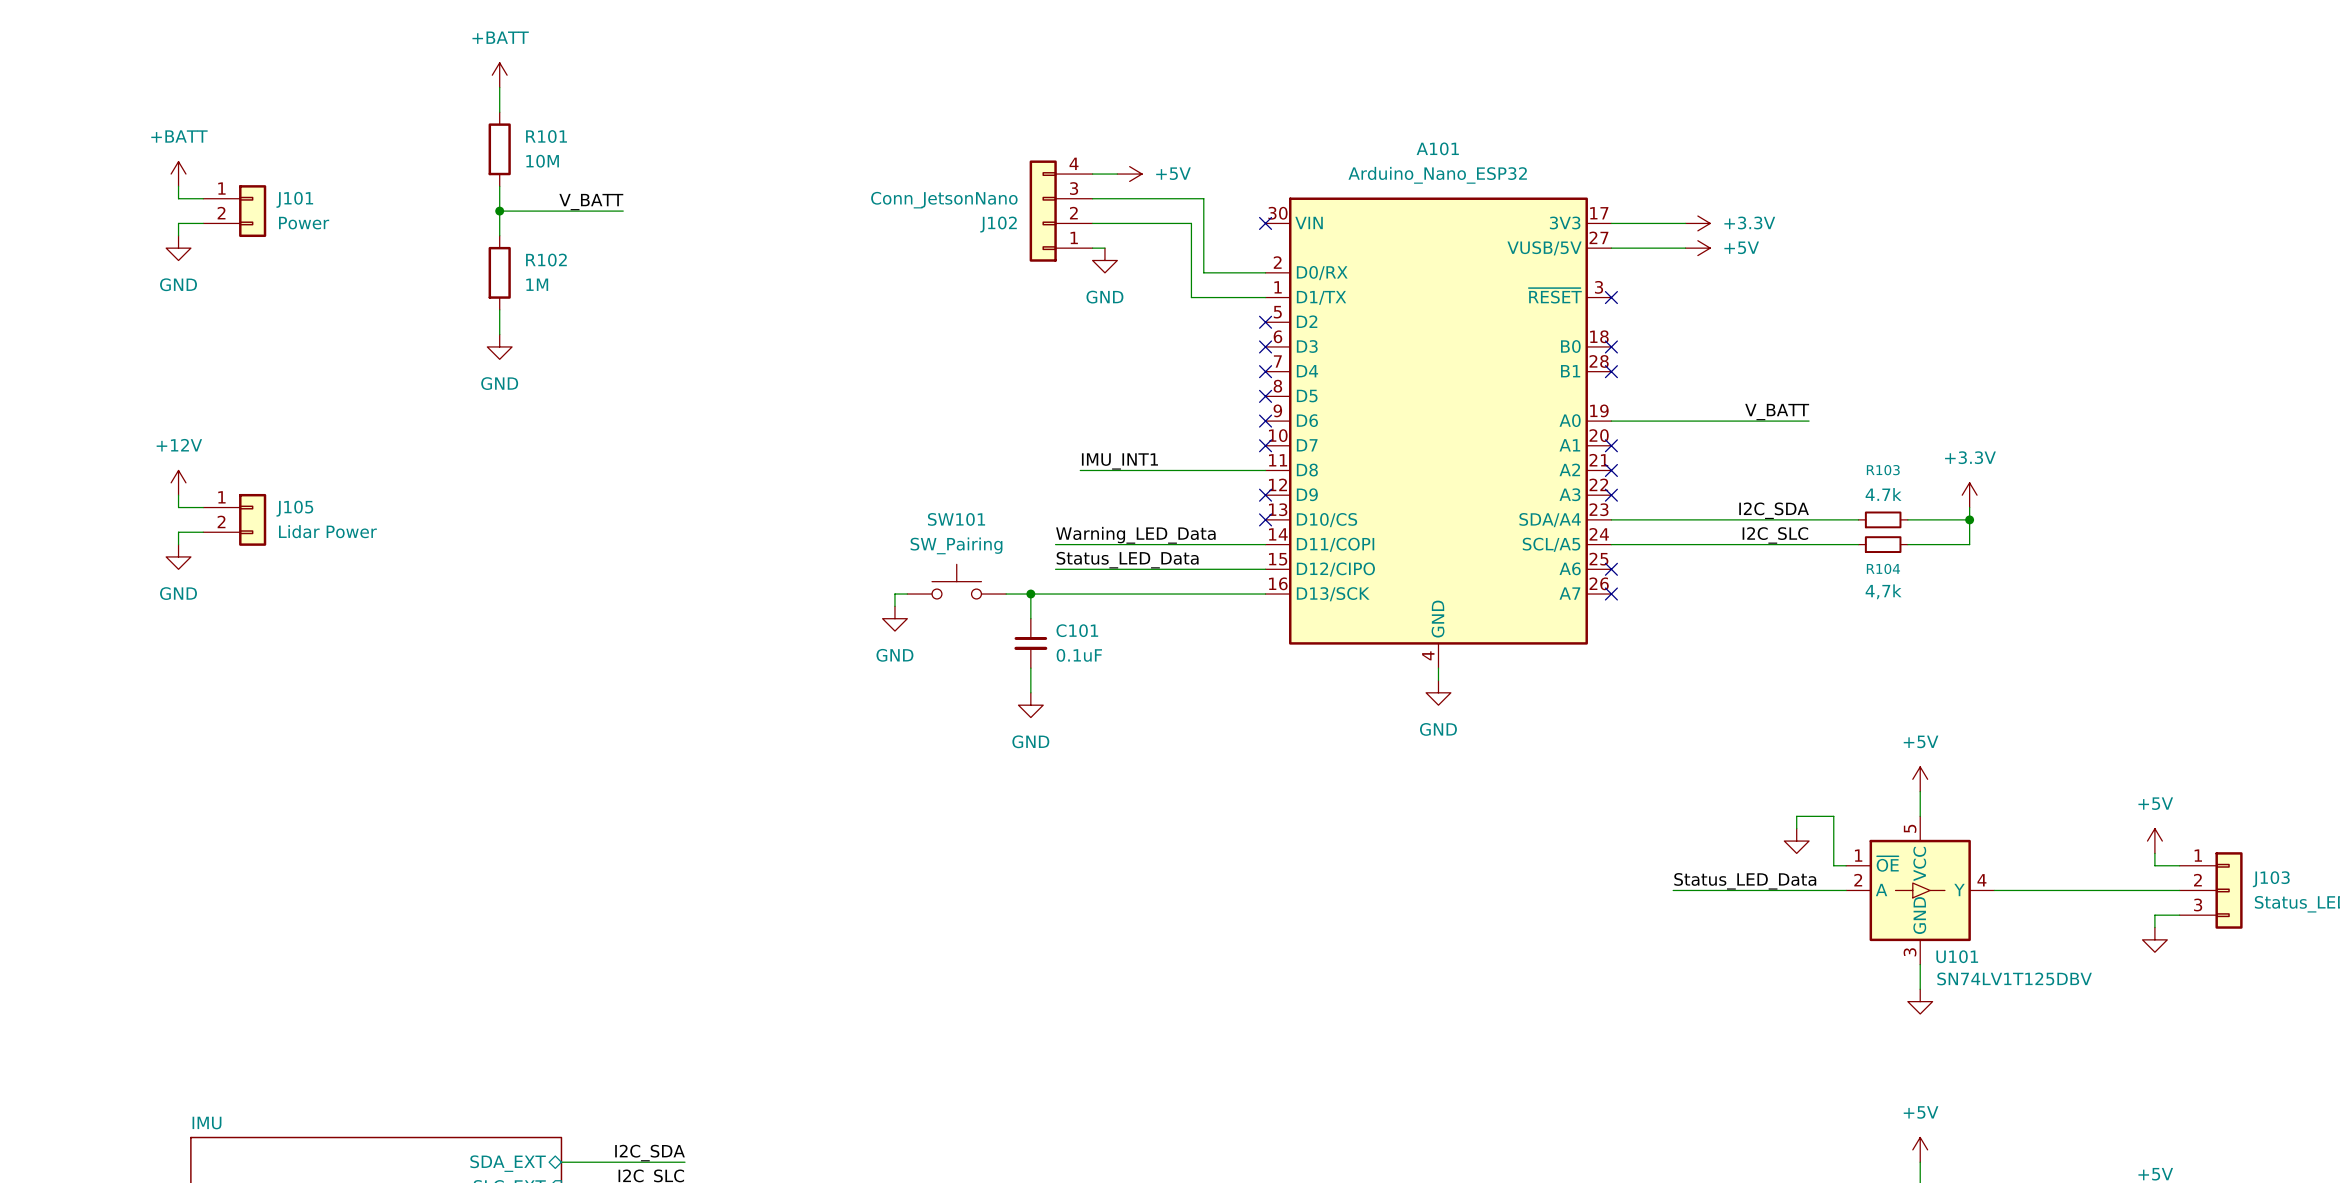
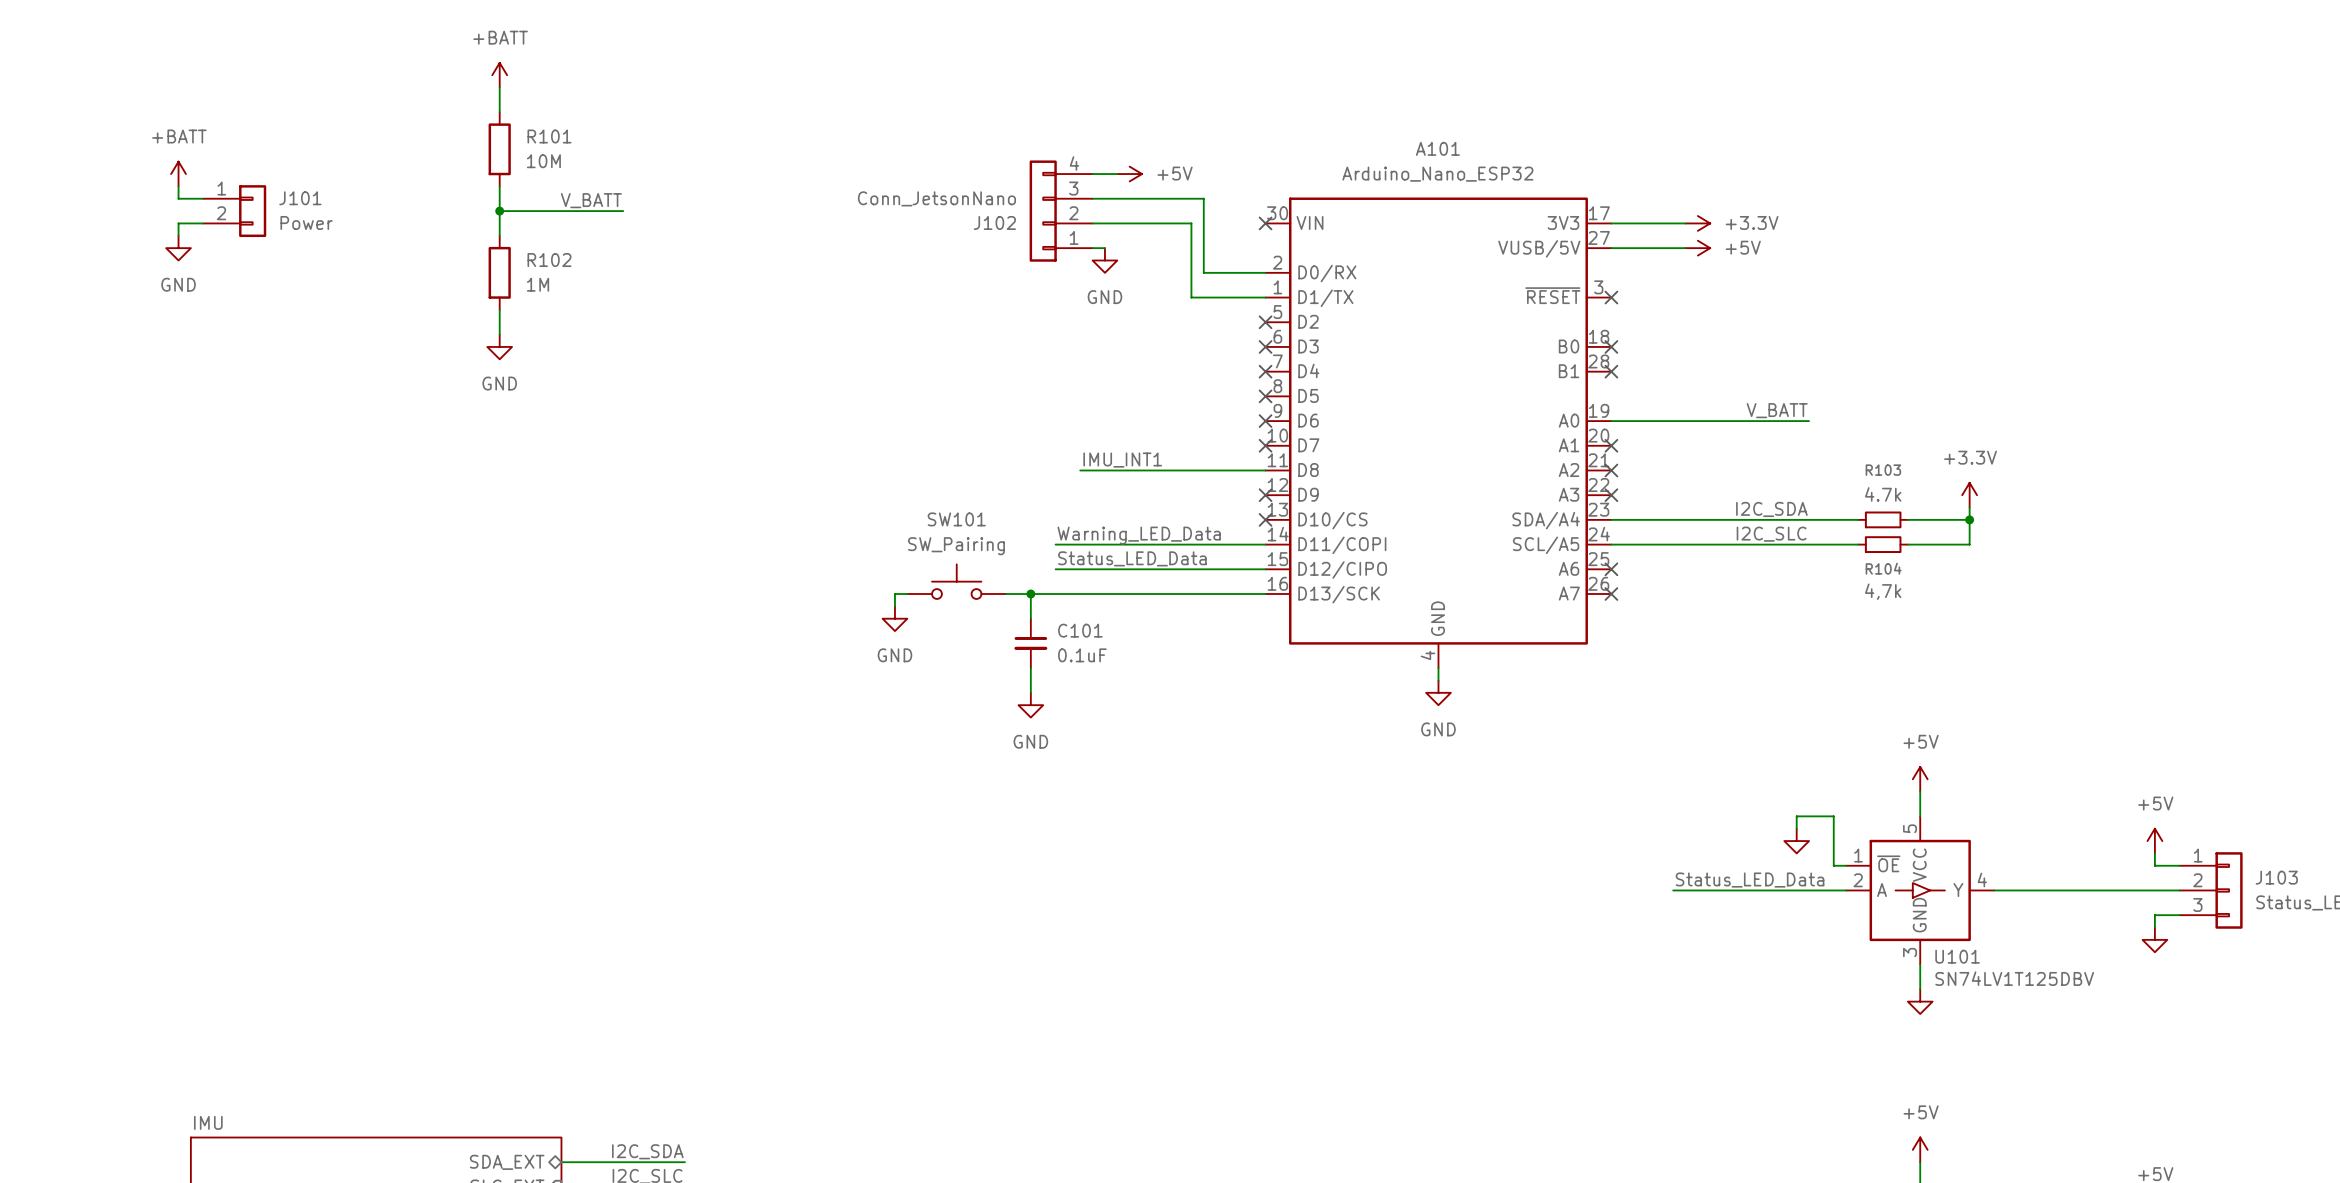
power symbol: +12V (178, 482) -> none
wire: (178, 495) (178, 507) (203, 507) -> none
J105: Lidar Power (234, 519) -> none
wire: (203, 532) (178, 532) (178, 544) -> none
power symbol: GND (178, 556) -> none

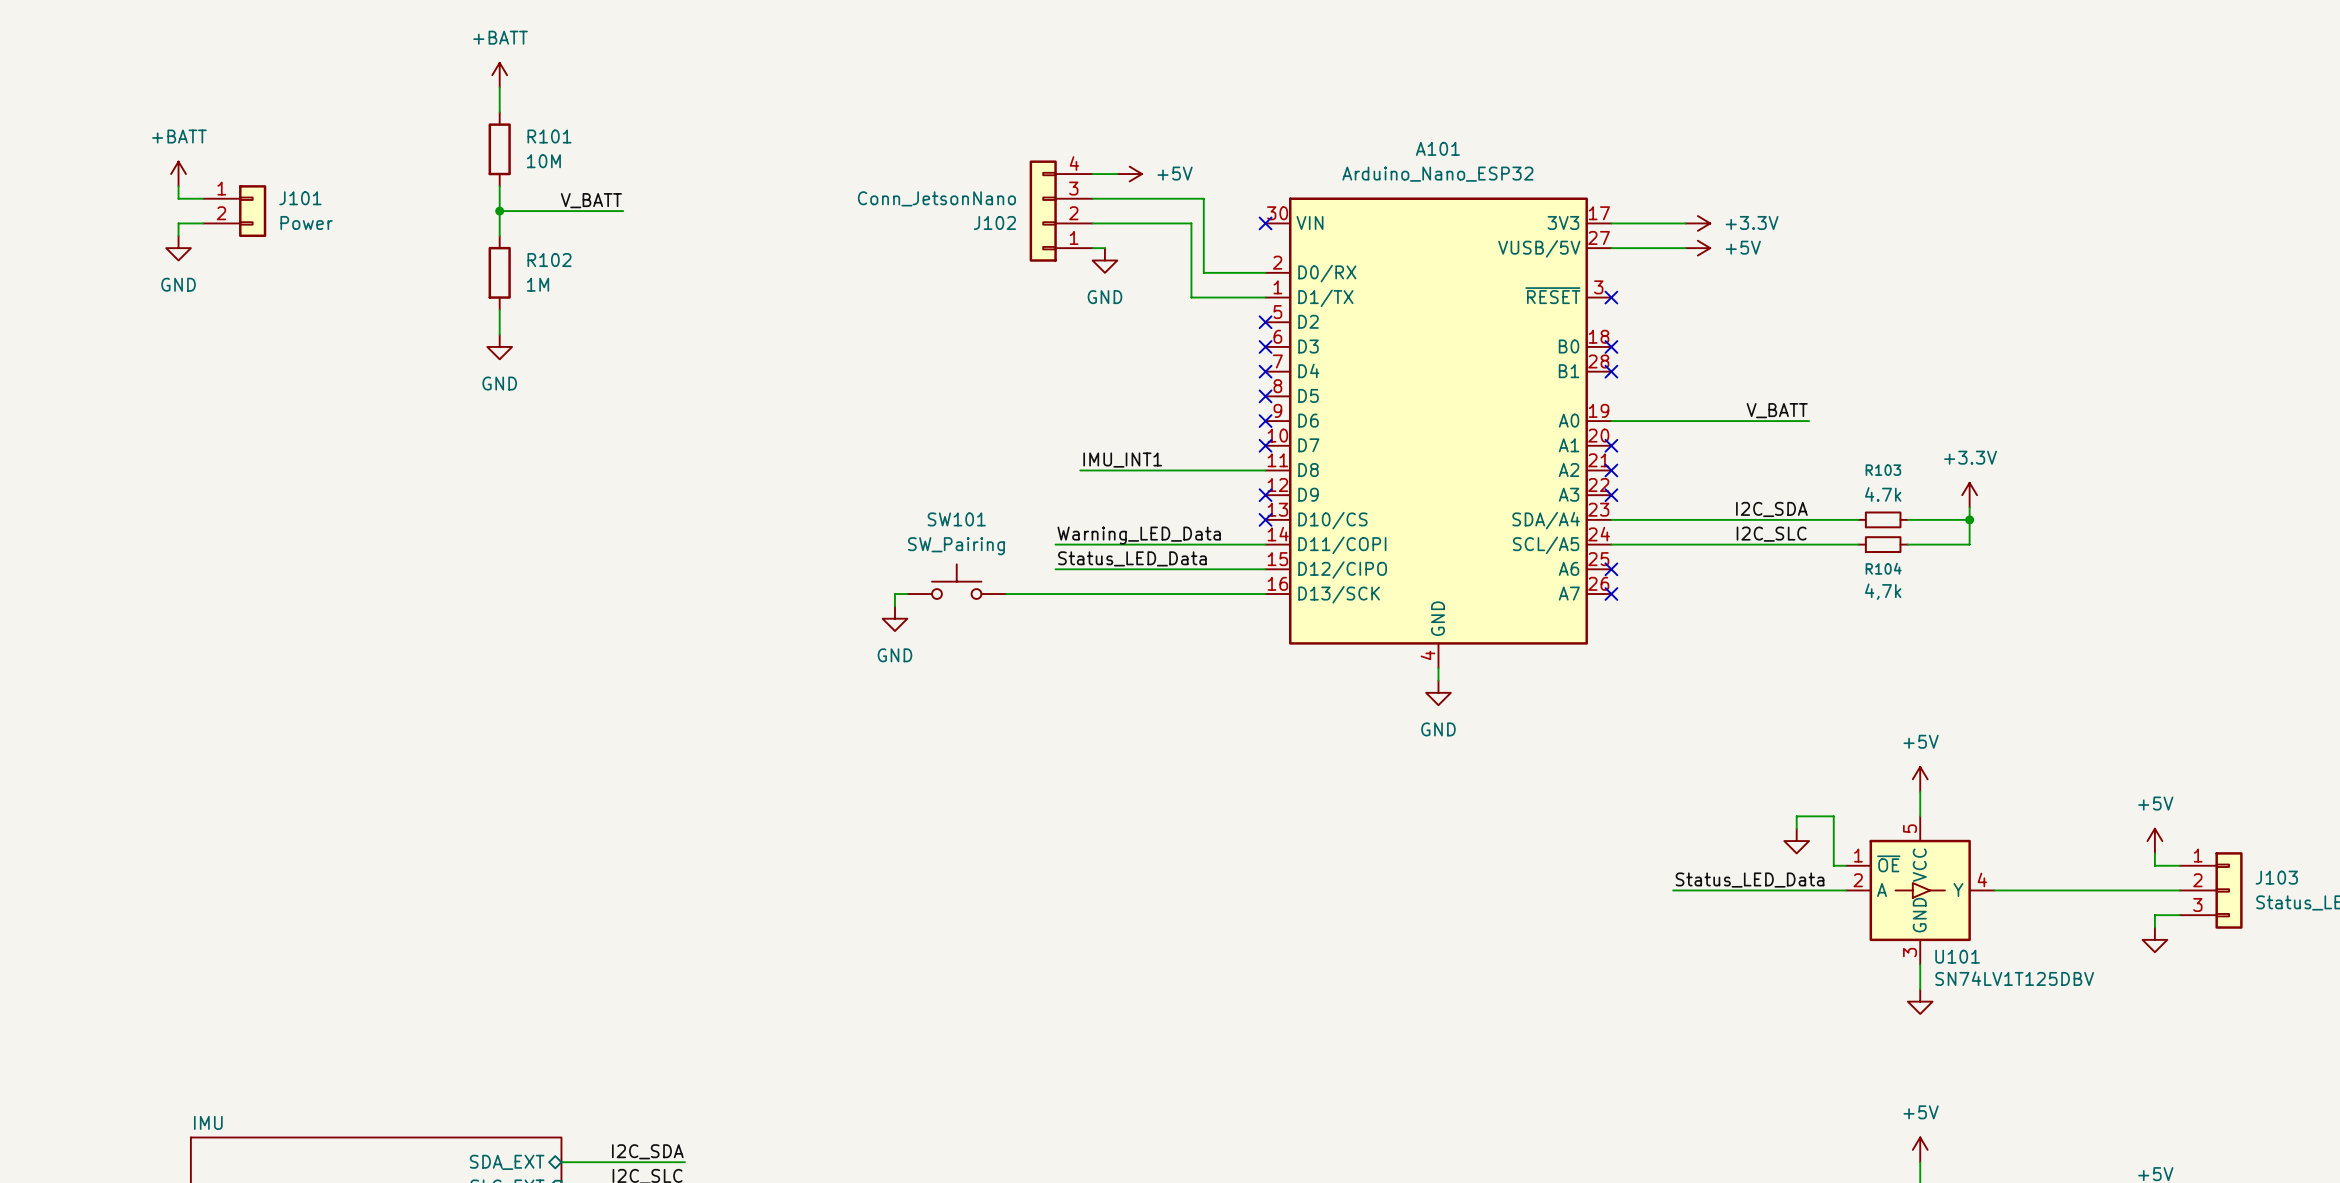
wire: (1030, 594) (1030, 618) -> none
junction: (1030, 594) -> none
C101: 0.1uF (1030, 643) -> none
wire: (1030, 668) (1030, 692) -> none
power symbol: GND (1030, 705) -> none

